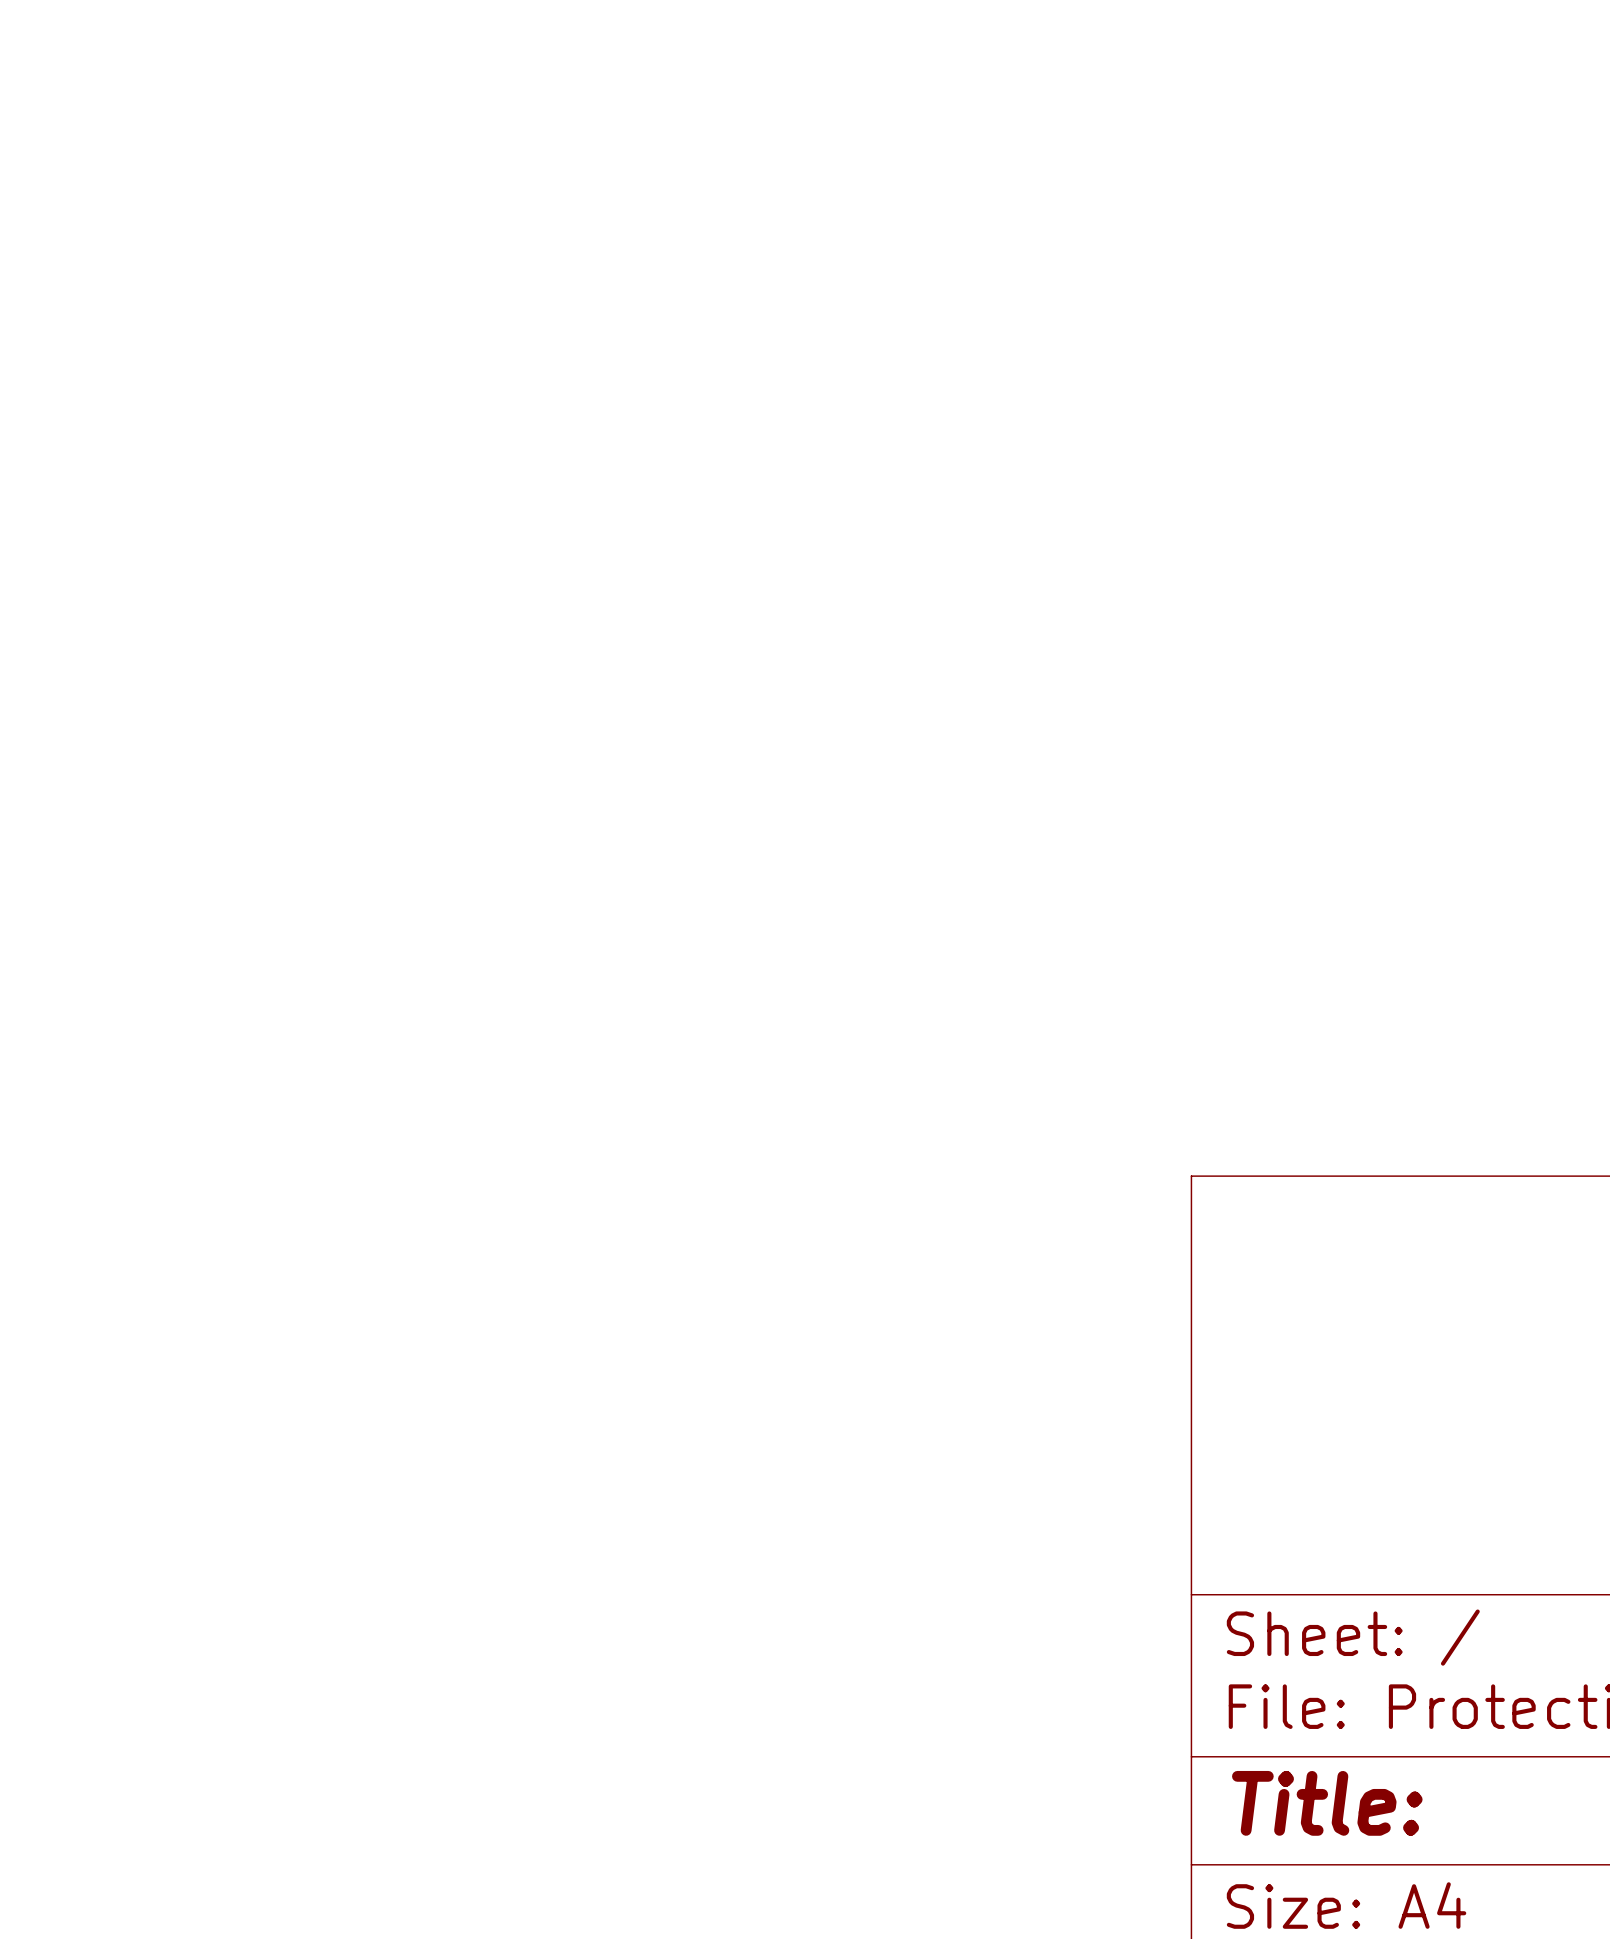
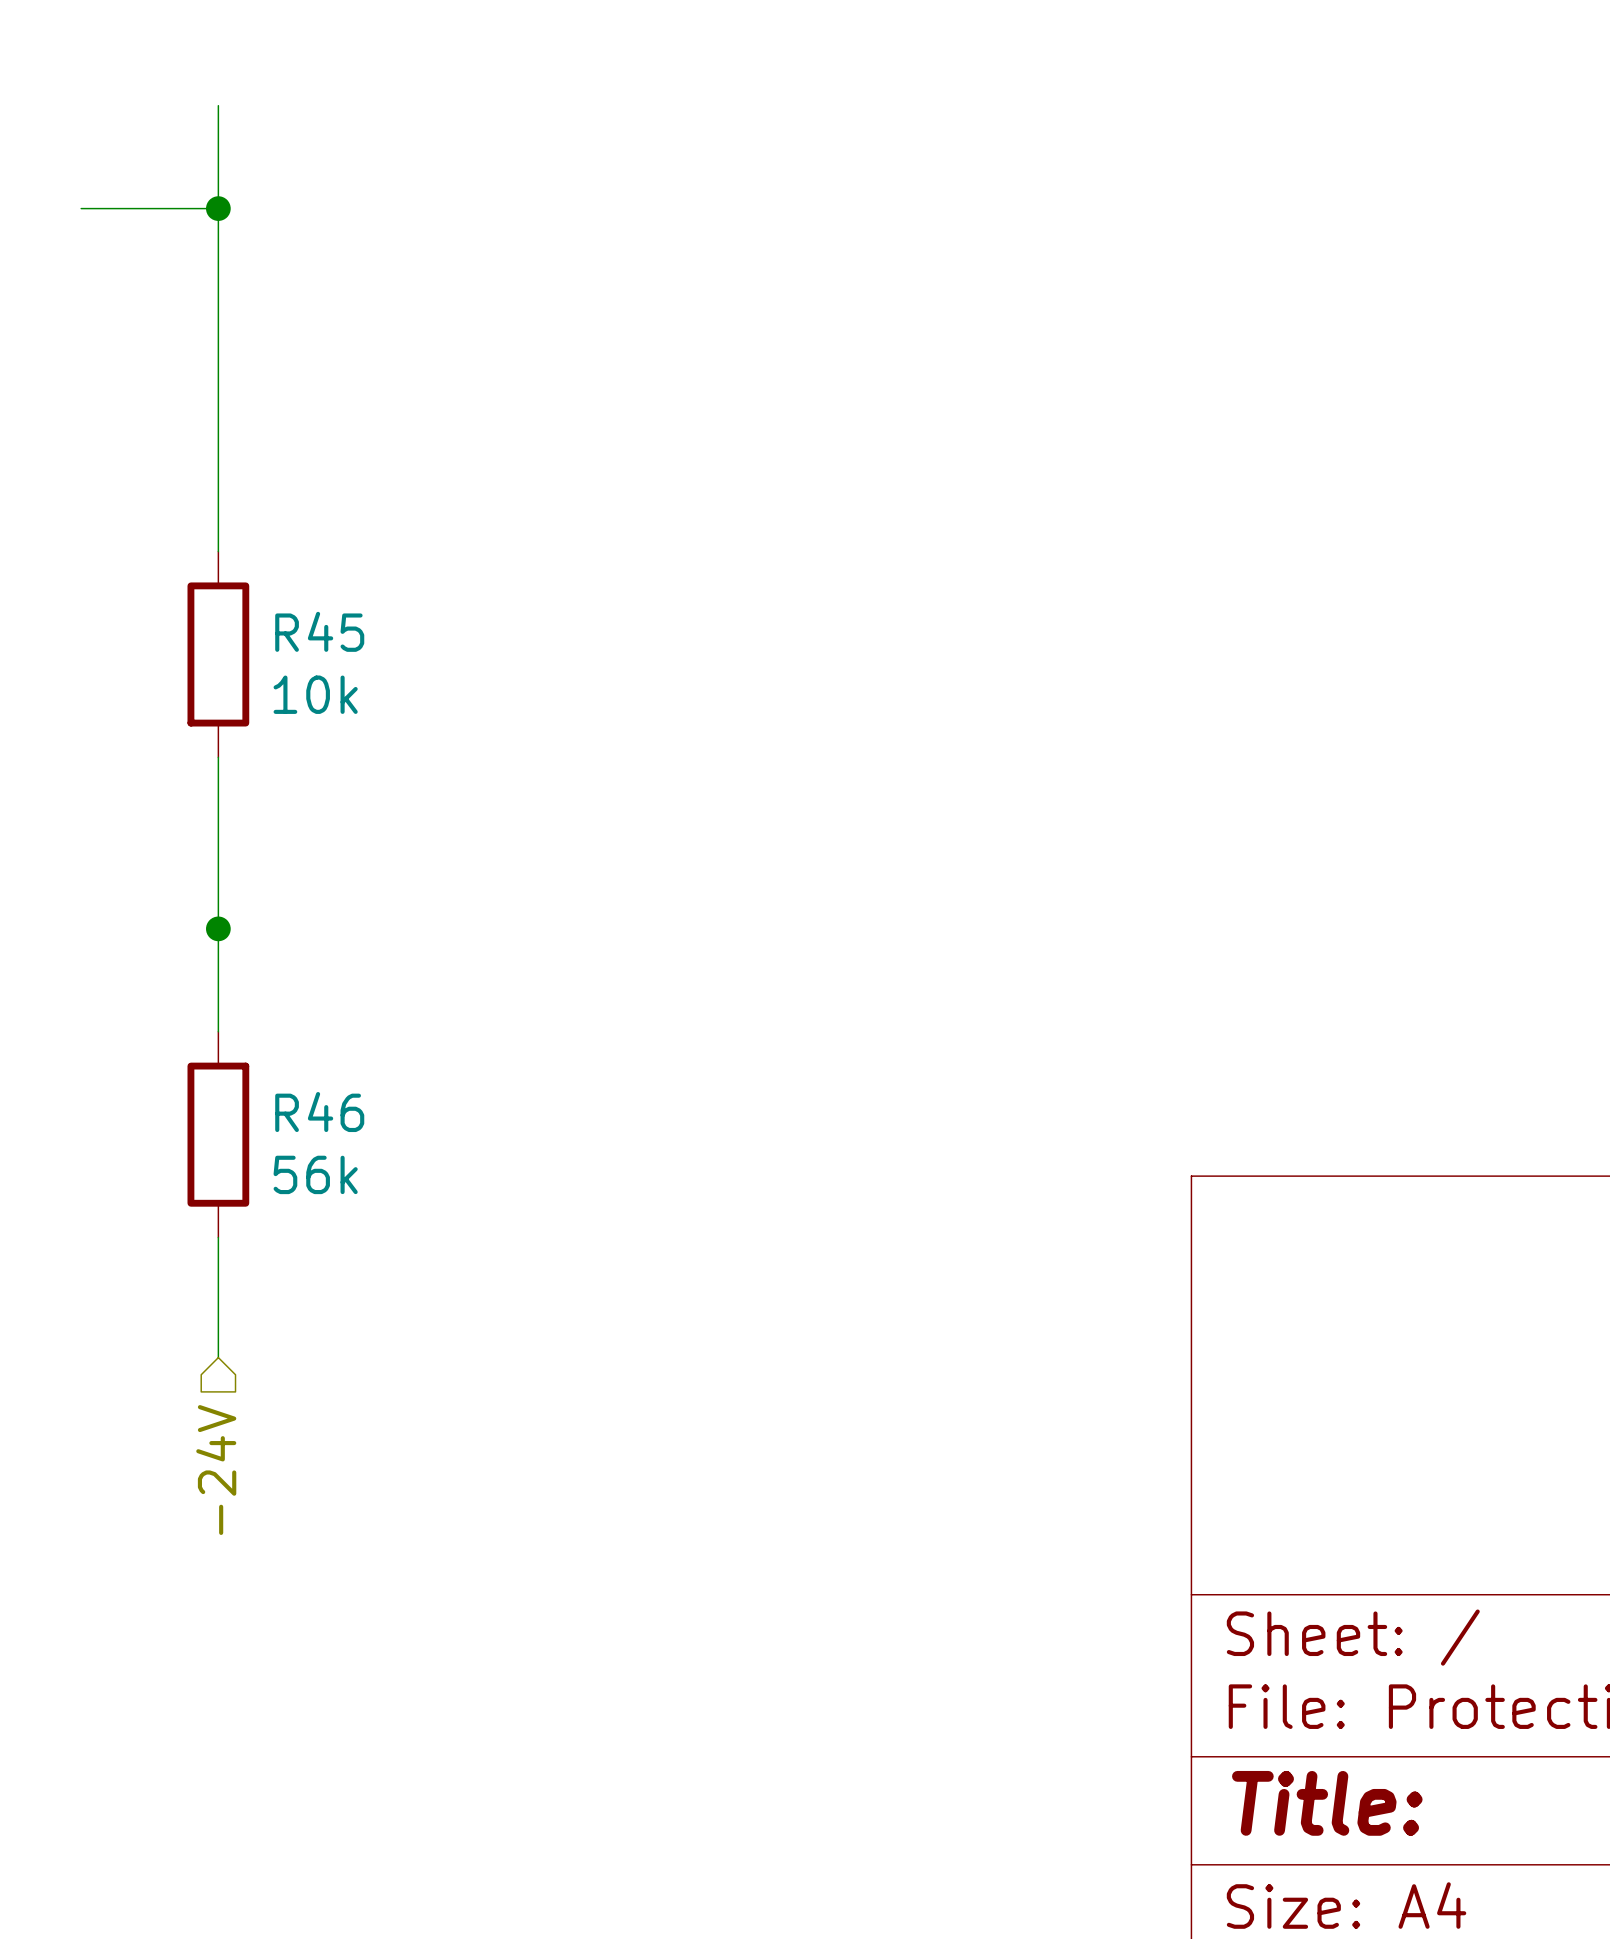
wire: none -> (218, 105) (218, 551)
wire: none -> (81, 208) (218, 208)
junction: none -> (218, 208)
R45: none -> 10k (218, 654)
wire: none -> (218, 757) (218, 1031)
junction: none -> (218, 928)
R46: none -> 56k (218, 1134)
wire: none -> (218, 1237) (218, 1357)
hierarchical label: none -> -24V (216, 1470)

